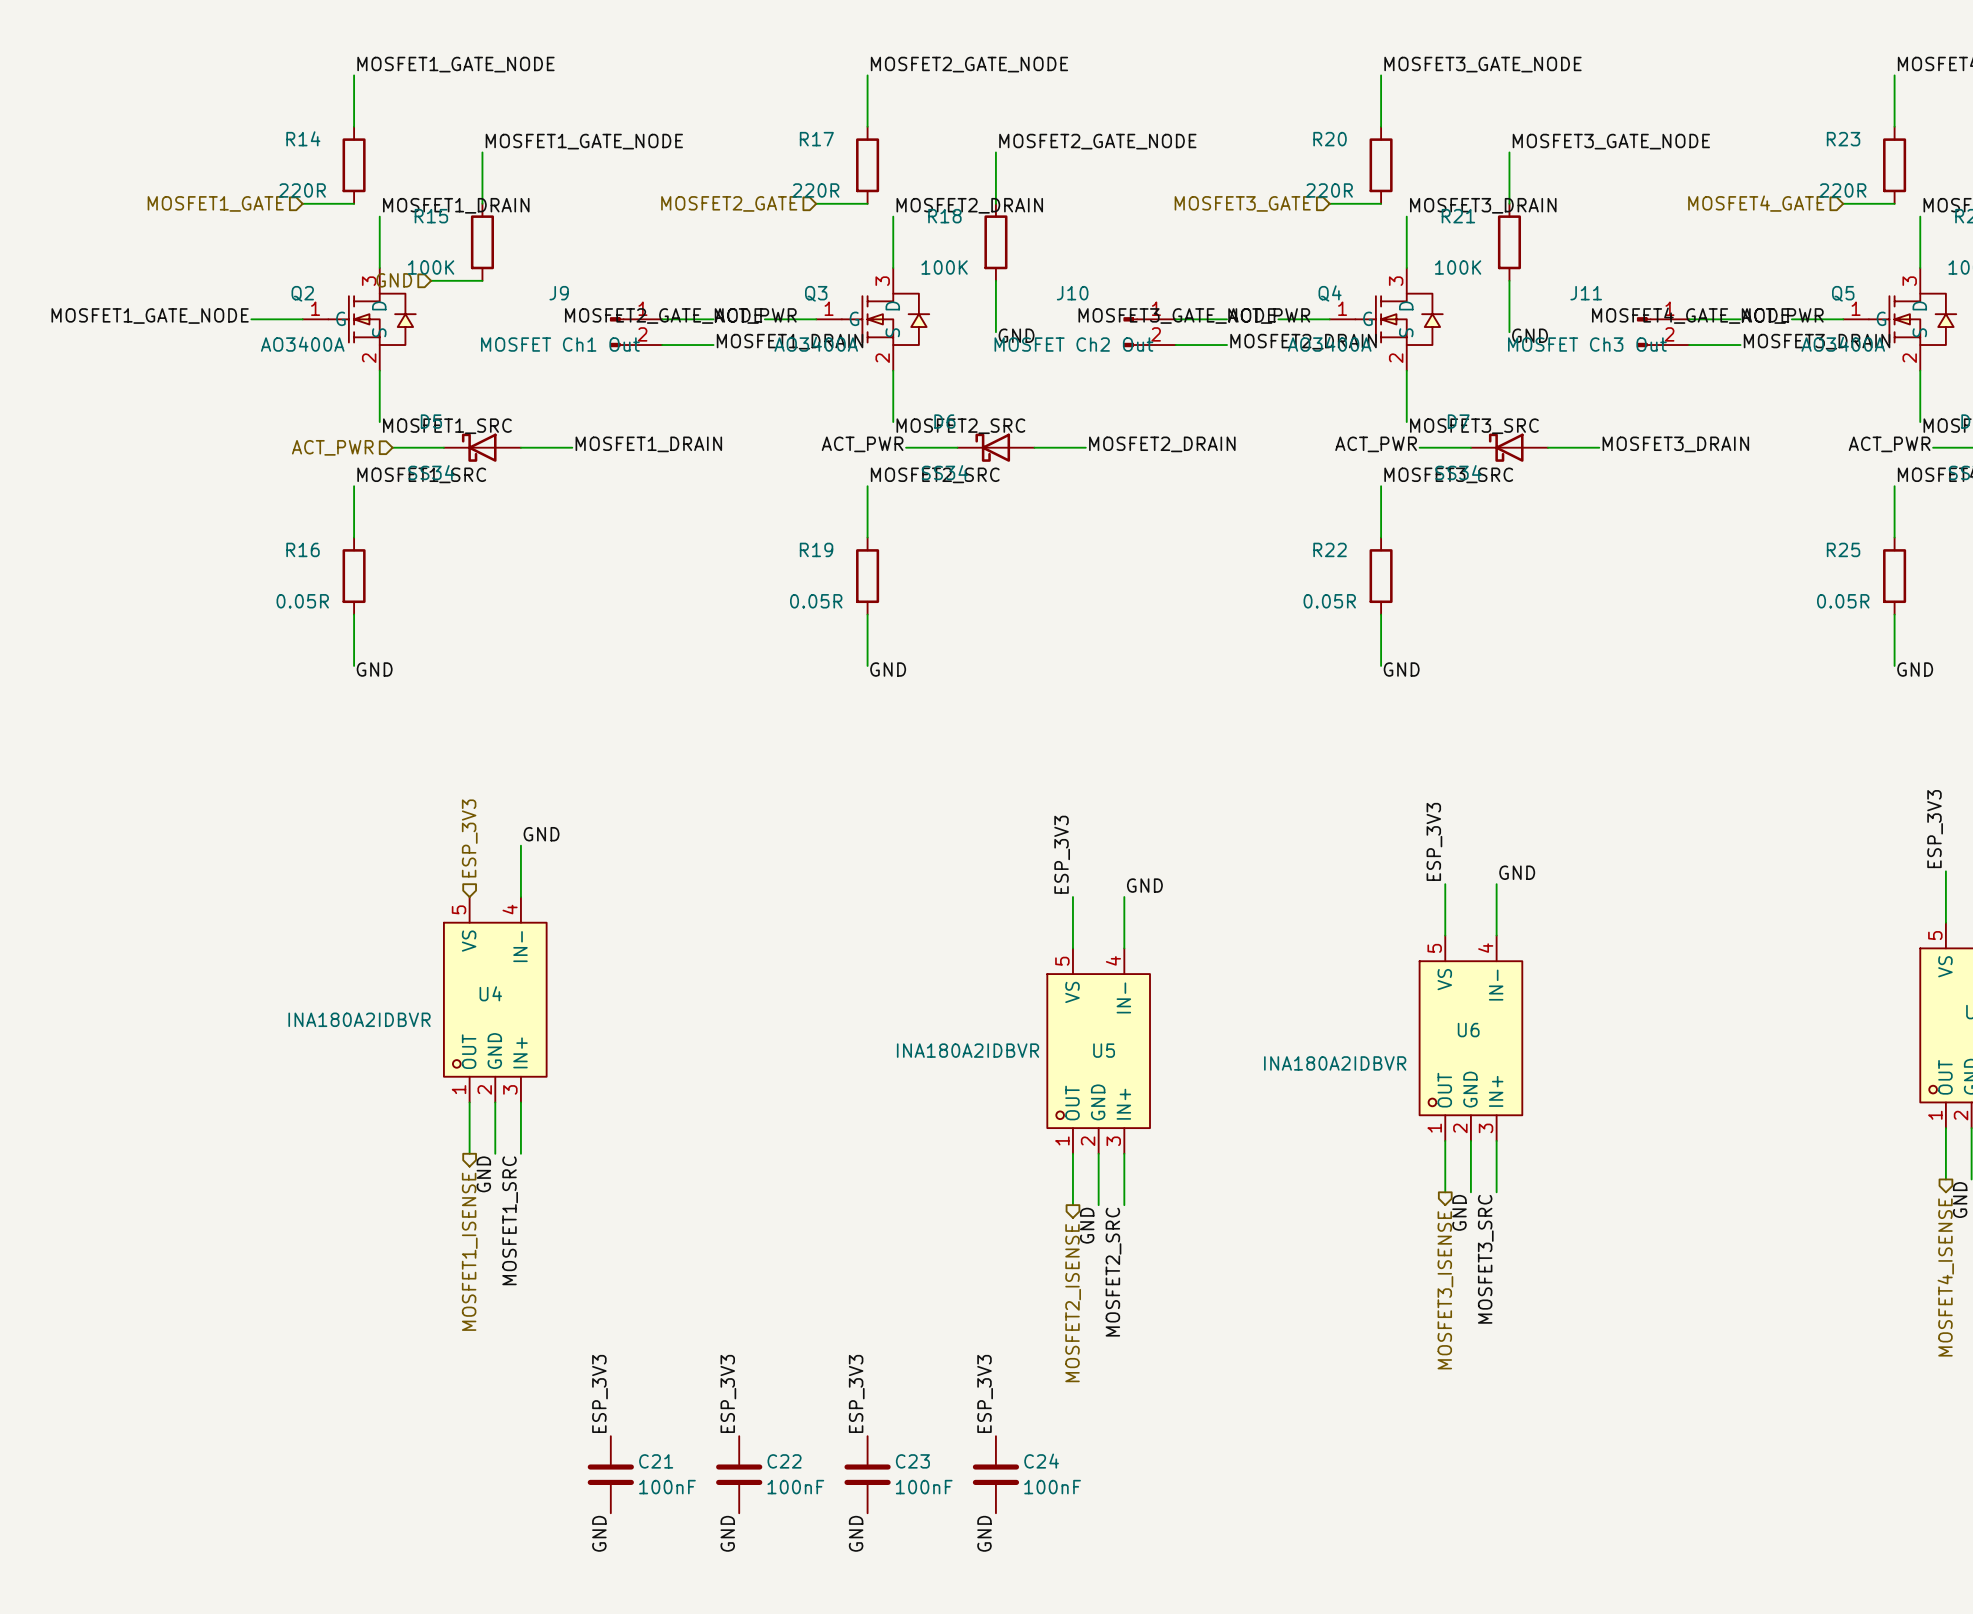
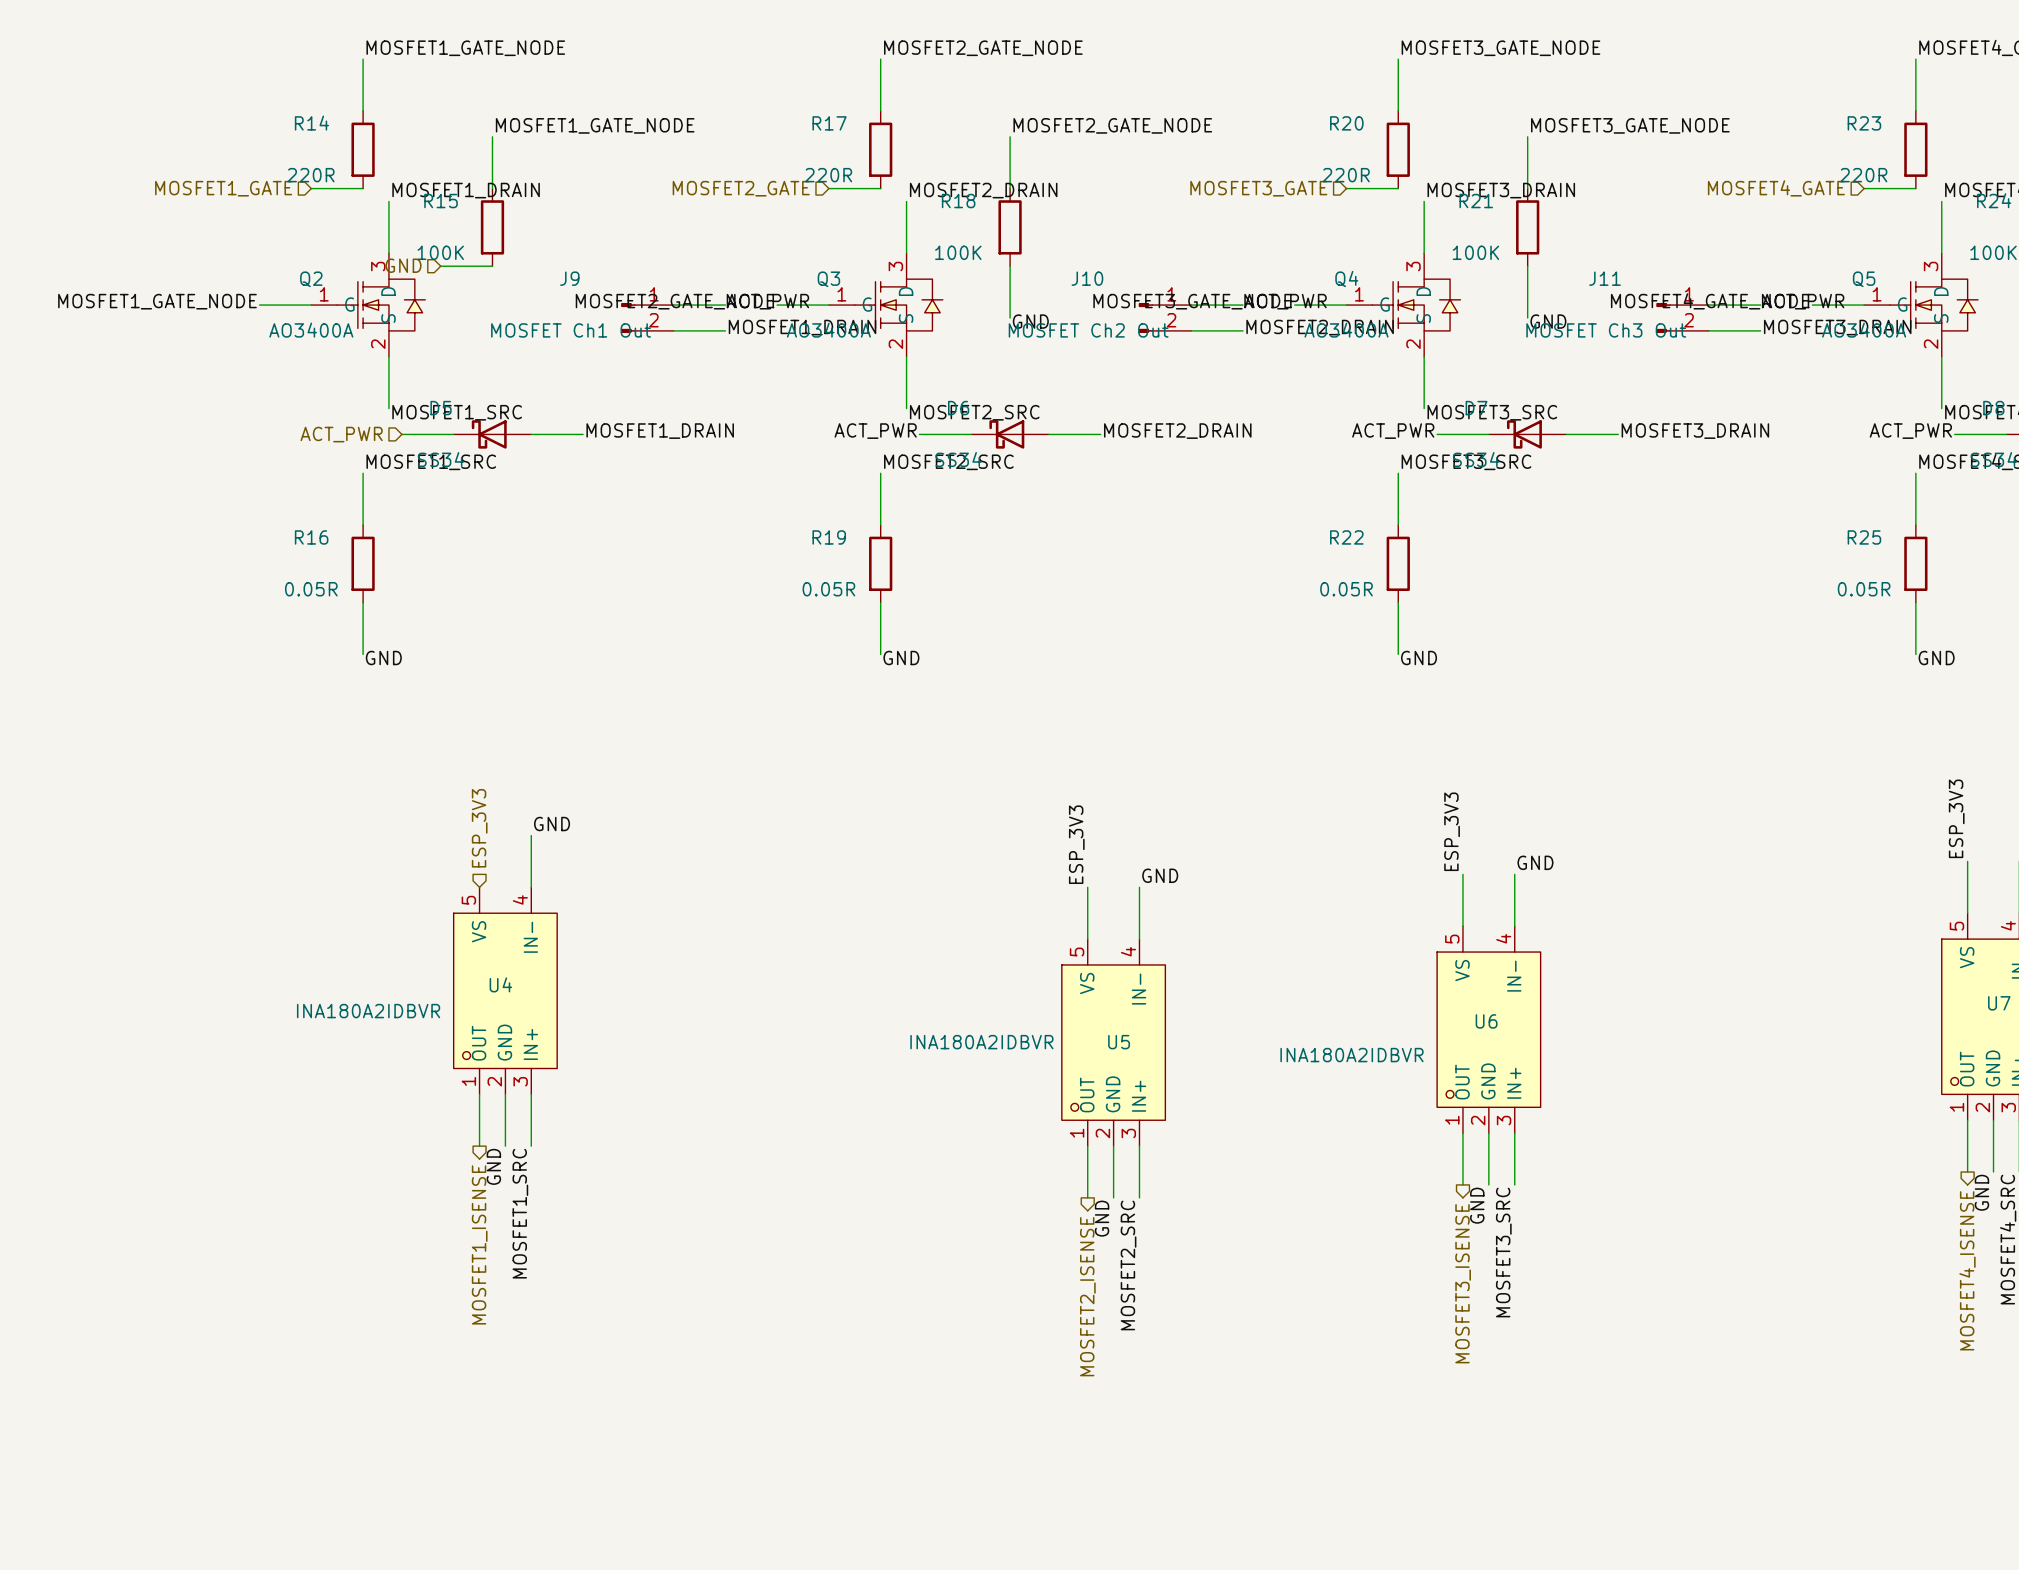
label: ESP_3V3 (599, 1393) -> none
label: ESP_3V3 (728, 1393) -> none
label: ESP_3V3 (856, 1393) -> none
label: ESP_3V3 (985, 1393) -> none
C21: 100nF (610, 1474) -> none
C22: 100nF (739, 1474) -> none
C23: 100nF (867, 1474) -> none
C24: 100nF (995, 1474) -> none
label: GND (599, 1533) -> none
label: GND (727, 1533) -> none
label: GND (856, 1533) -> none
label: GND (984, 1533) -> none

